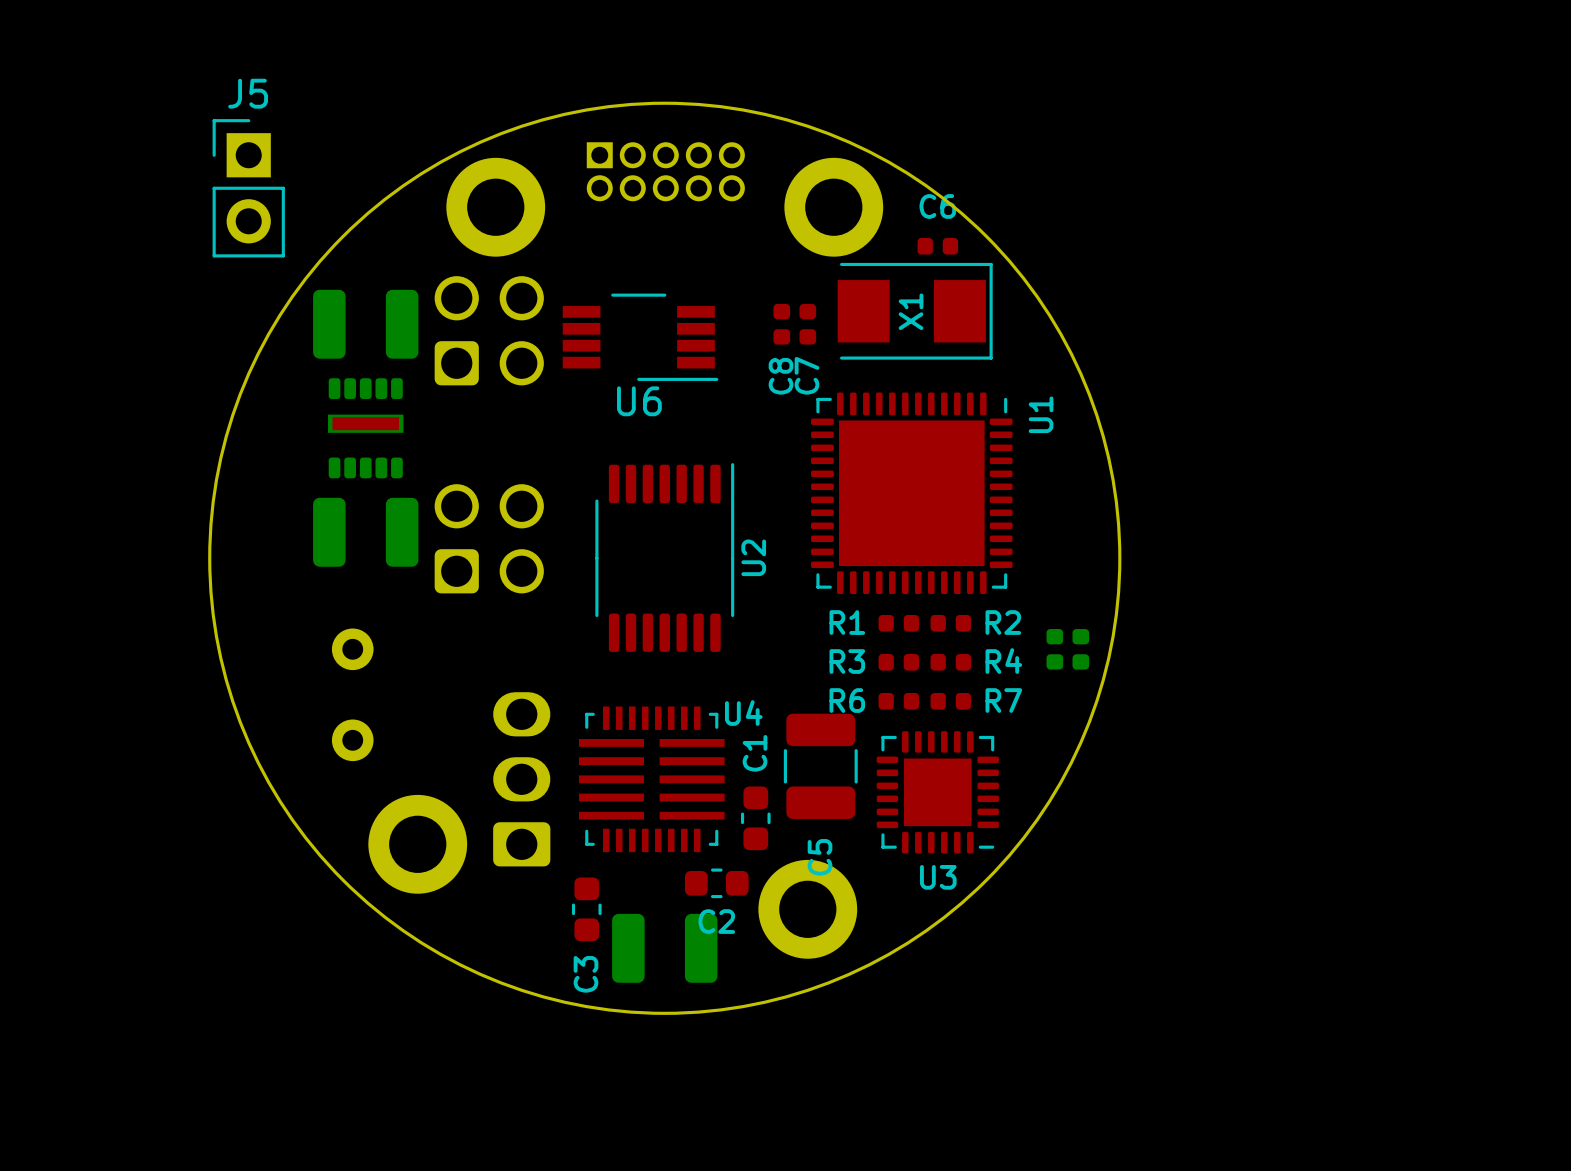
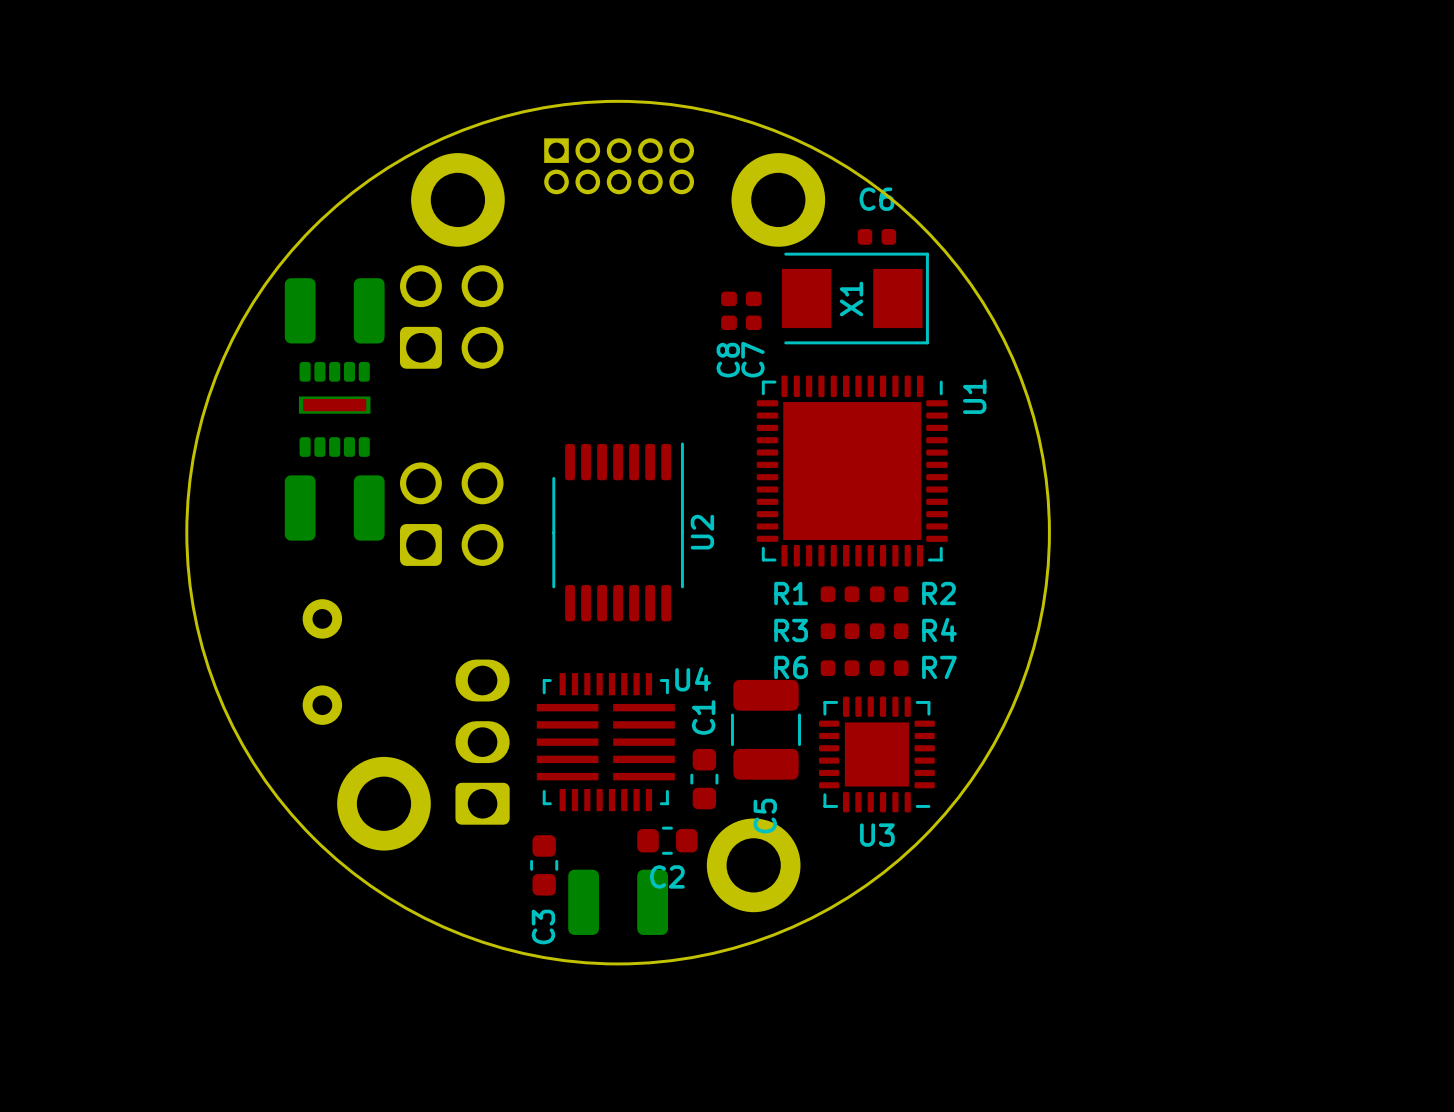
J5: (248, 188) -> none
U6: (640, 337) -> none
part: (1054, 649) -> none
part: (1080, 649) -> none

